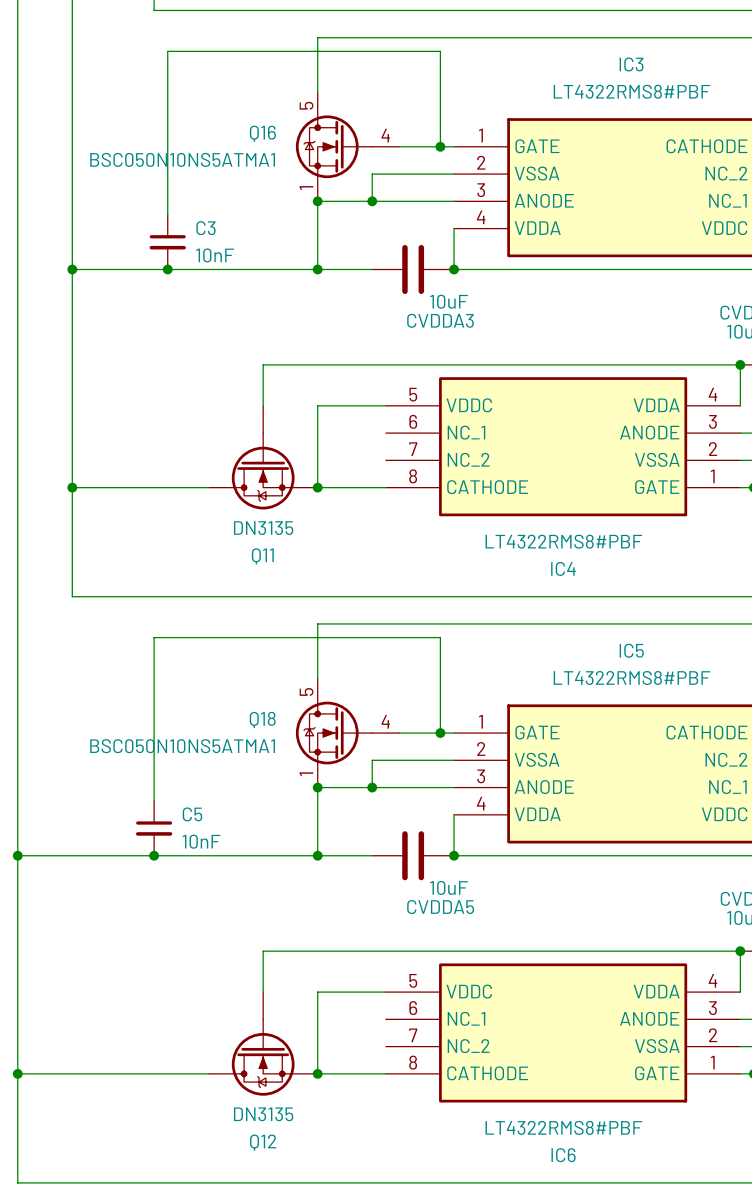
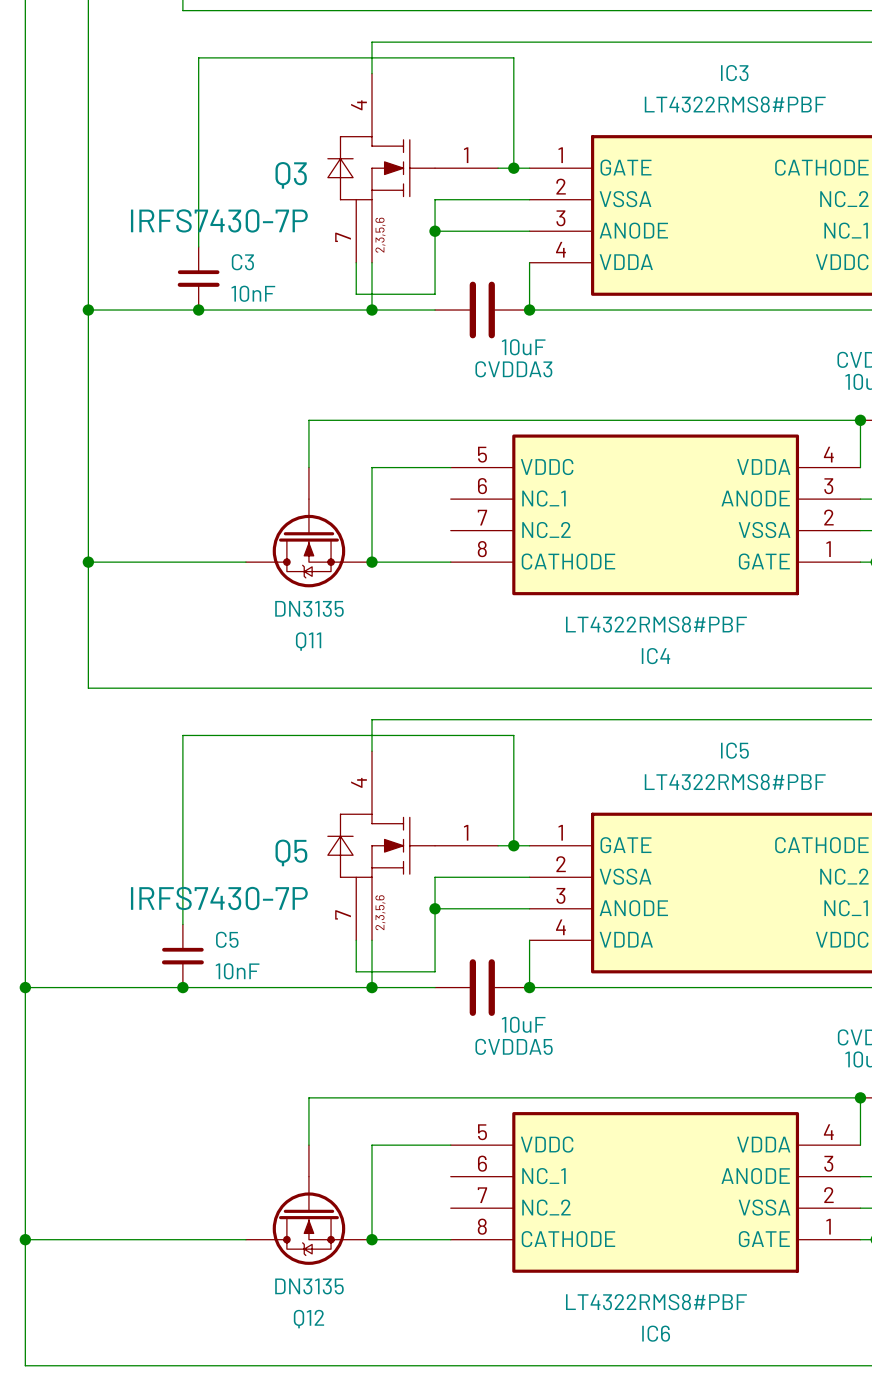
Q16: BSC050N10NS5ATMA1 (347, 146) -> none
Q3: none -> IRFS7430-7P (412, 168)
junction: (317, 201) -> none
wire: (372, 201) (317, 201) (317, 228) -> (435, 231) (435, 294) (356, 294) (356, 262)
Q18: BSC050N10NS5ATMA1 (347, 733) -> none
Q5: none -> IRFS7430-7P (412, 845)
junction: (317, 787) -> none
wire: (372, 787) (317, 787) (317, 814) -> (435, 908) (435, 971) (356, 971) (356, 940)

